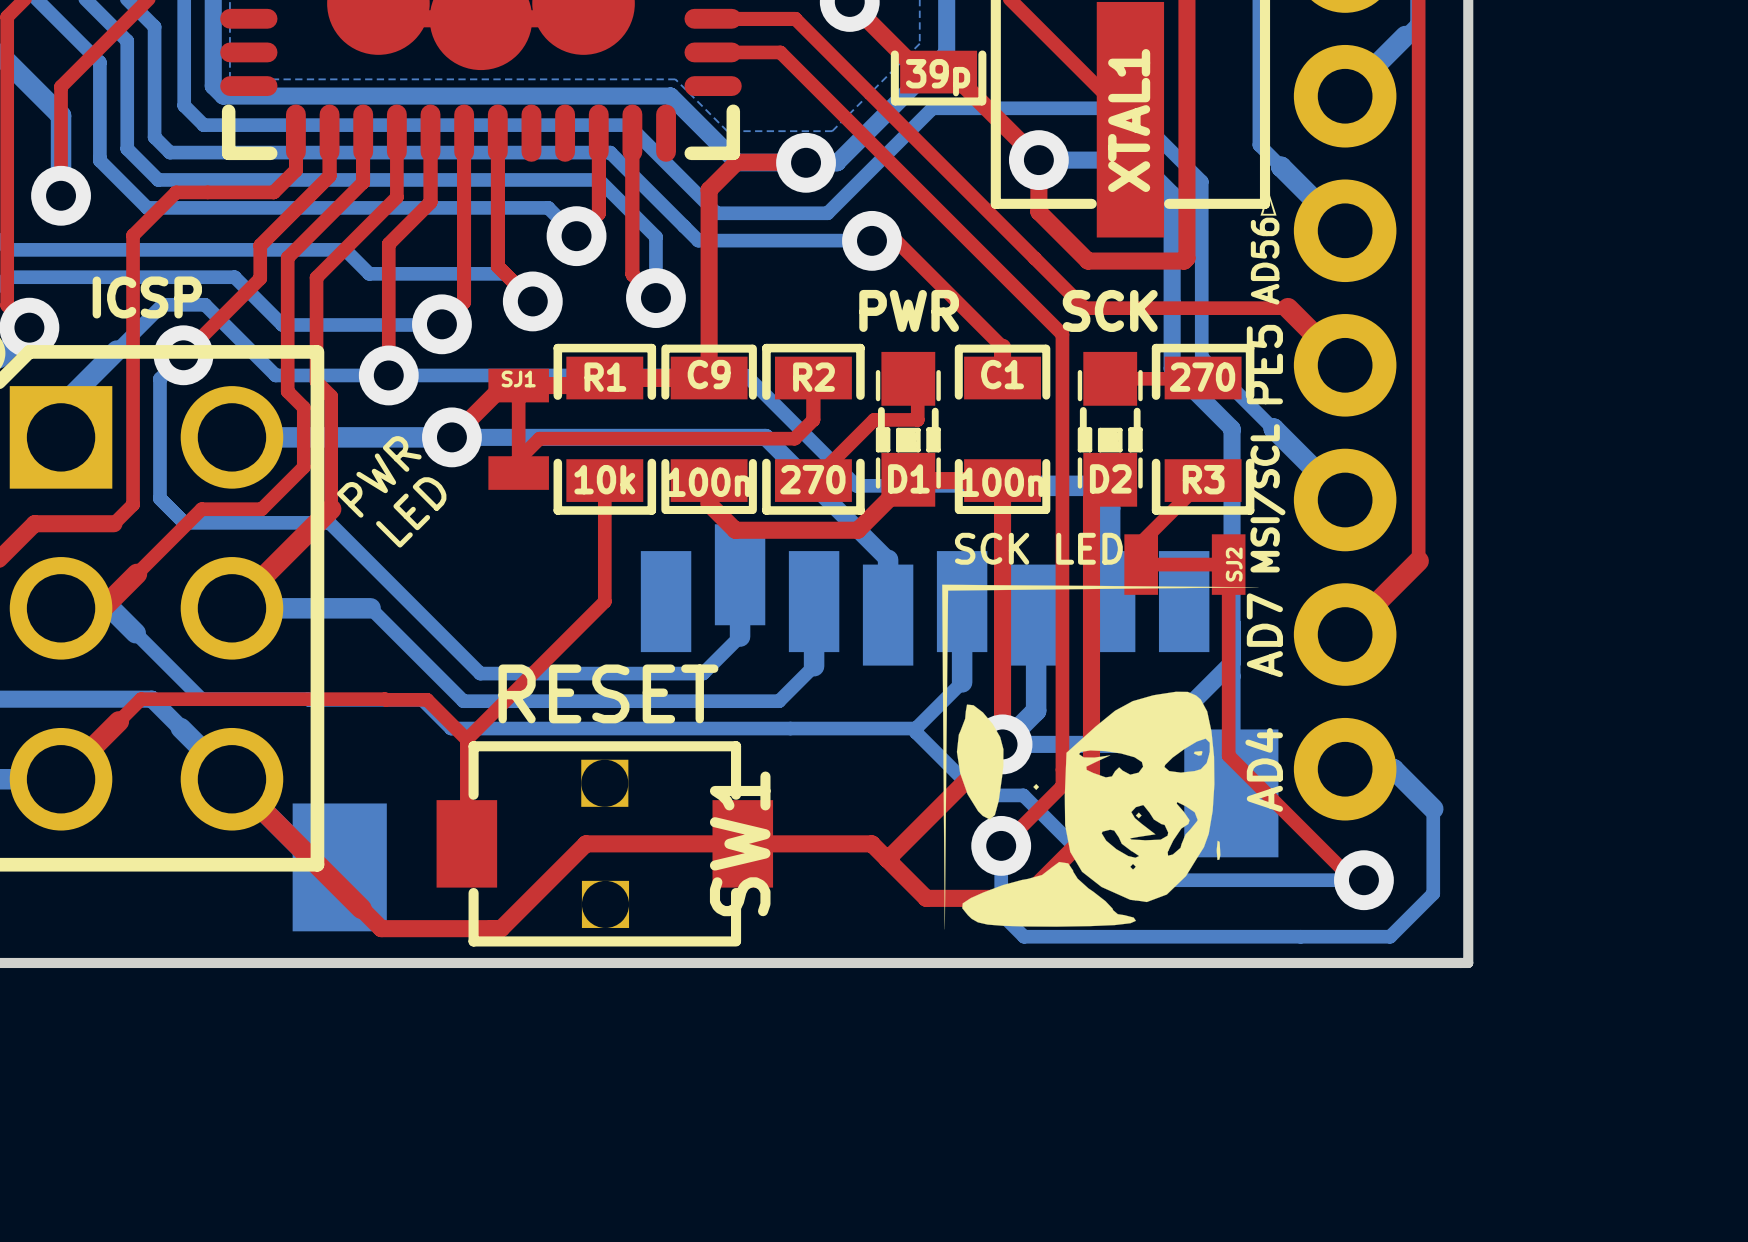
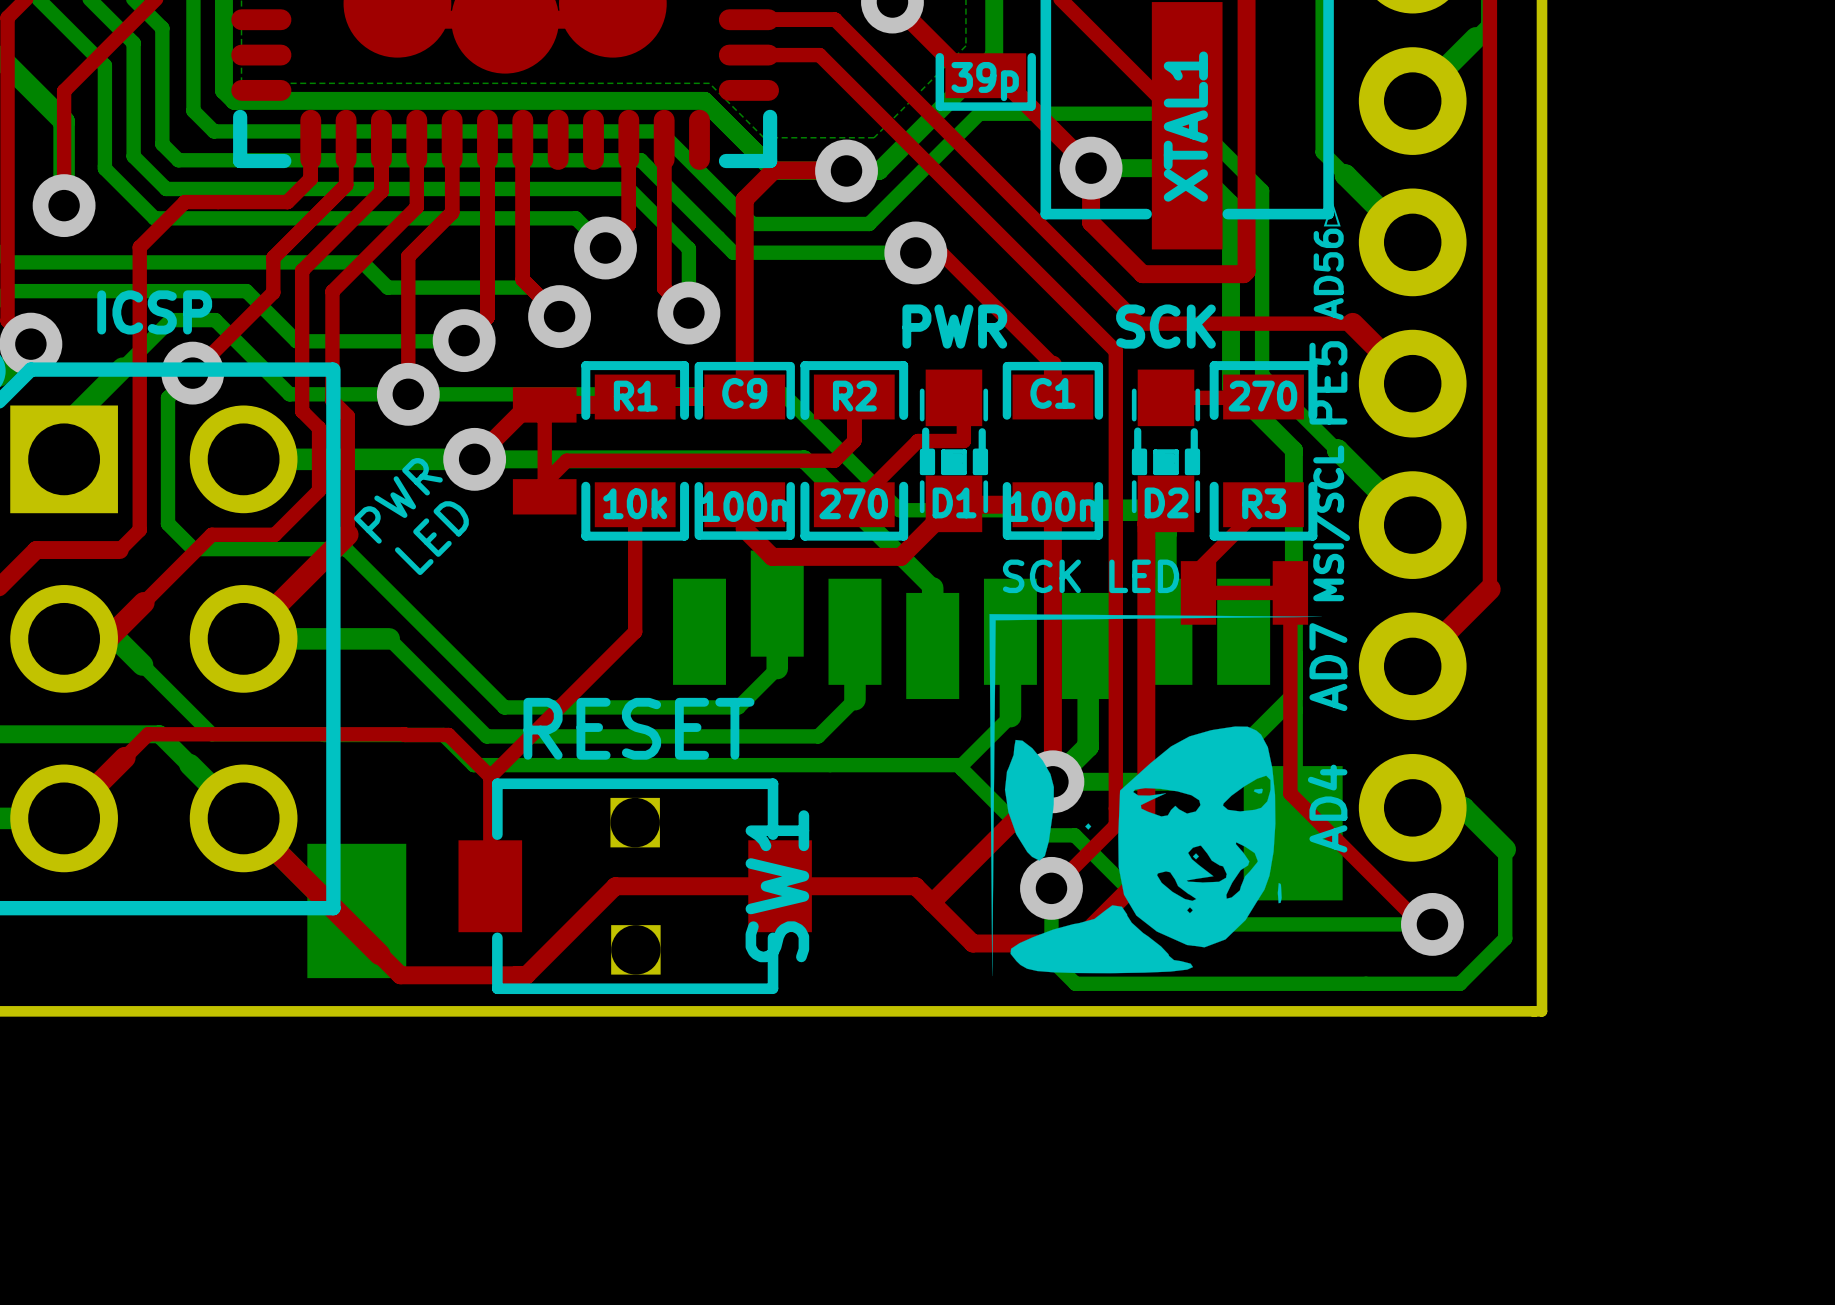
SJ1 name: SJ1 (518, 379) -> none
SJ2 name: SJ2 (1234, 564) -> none

